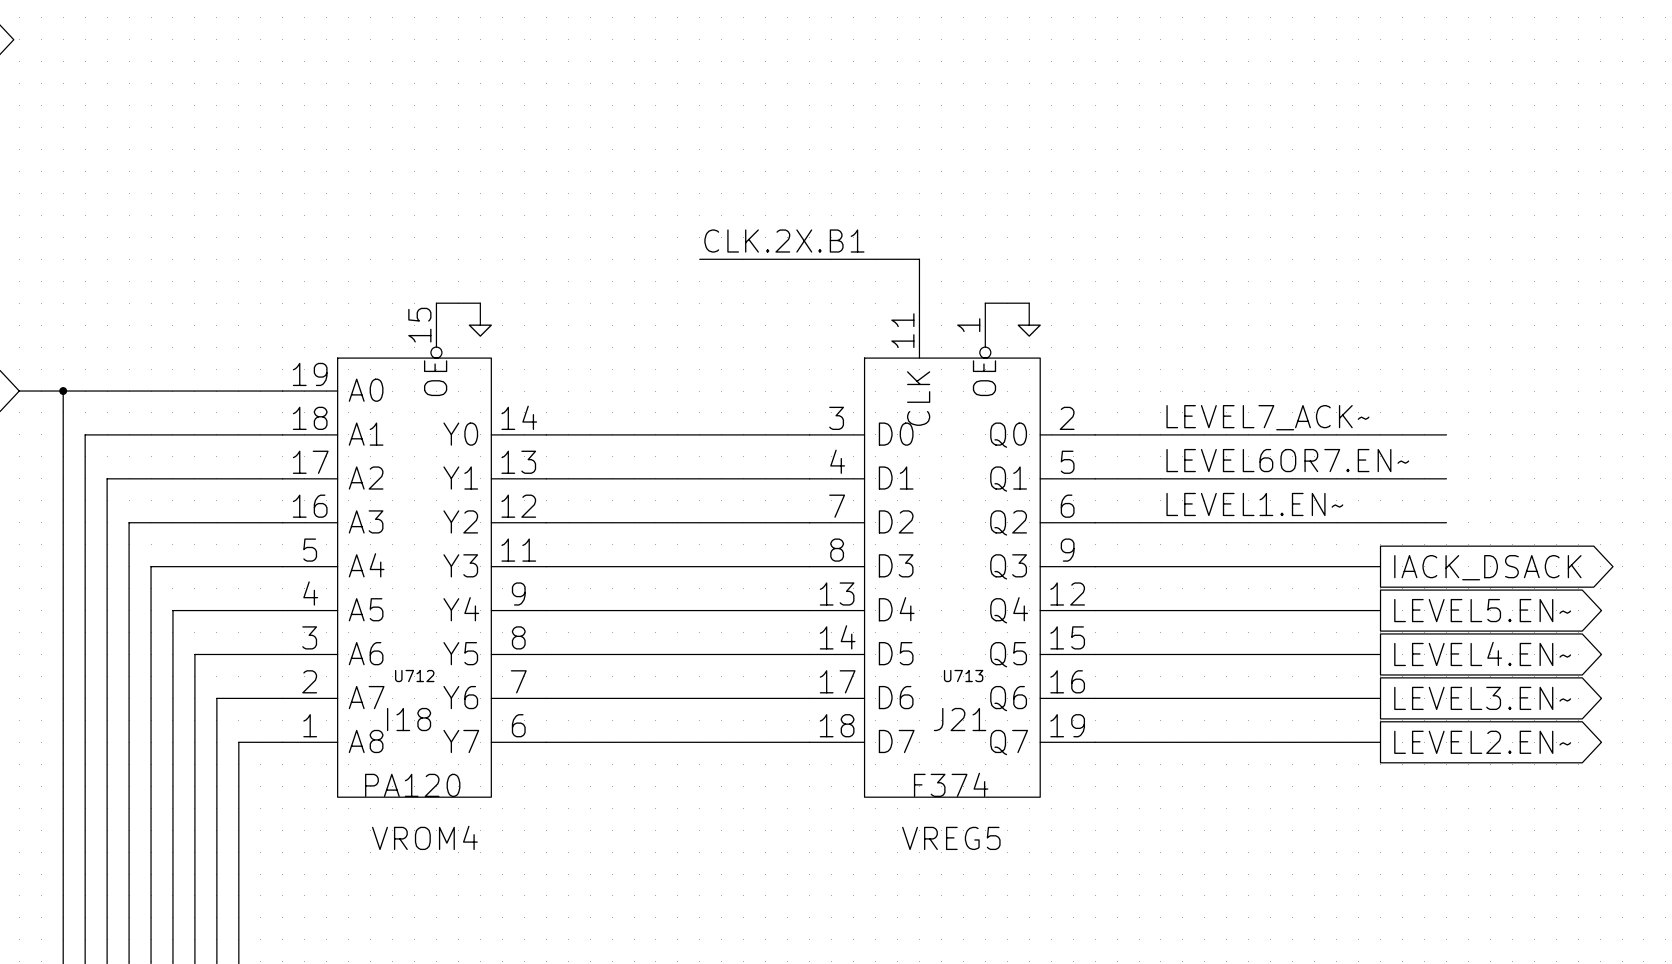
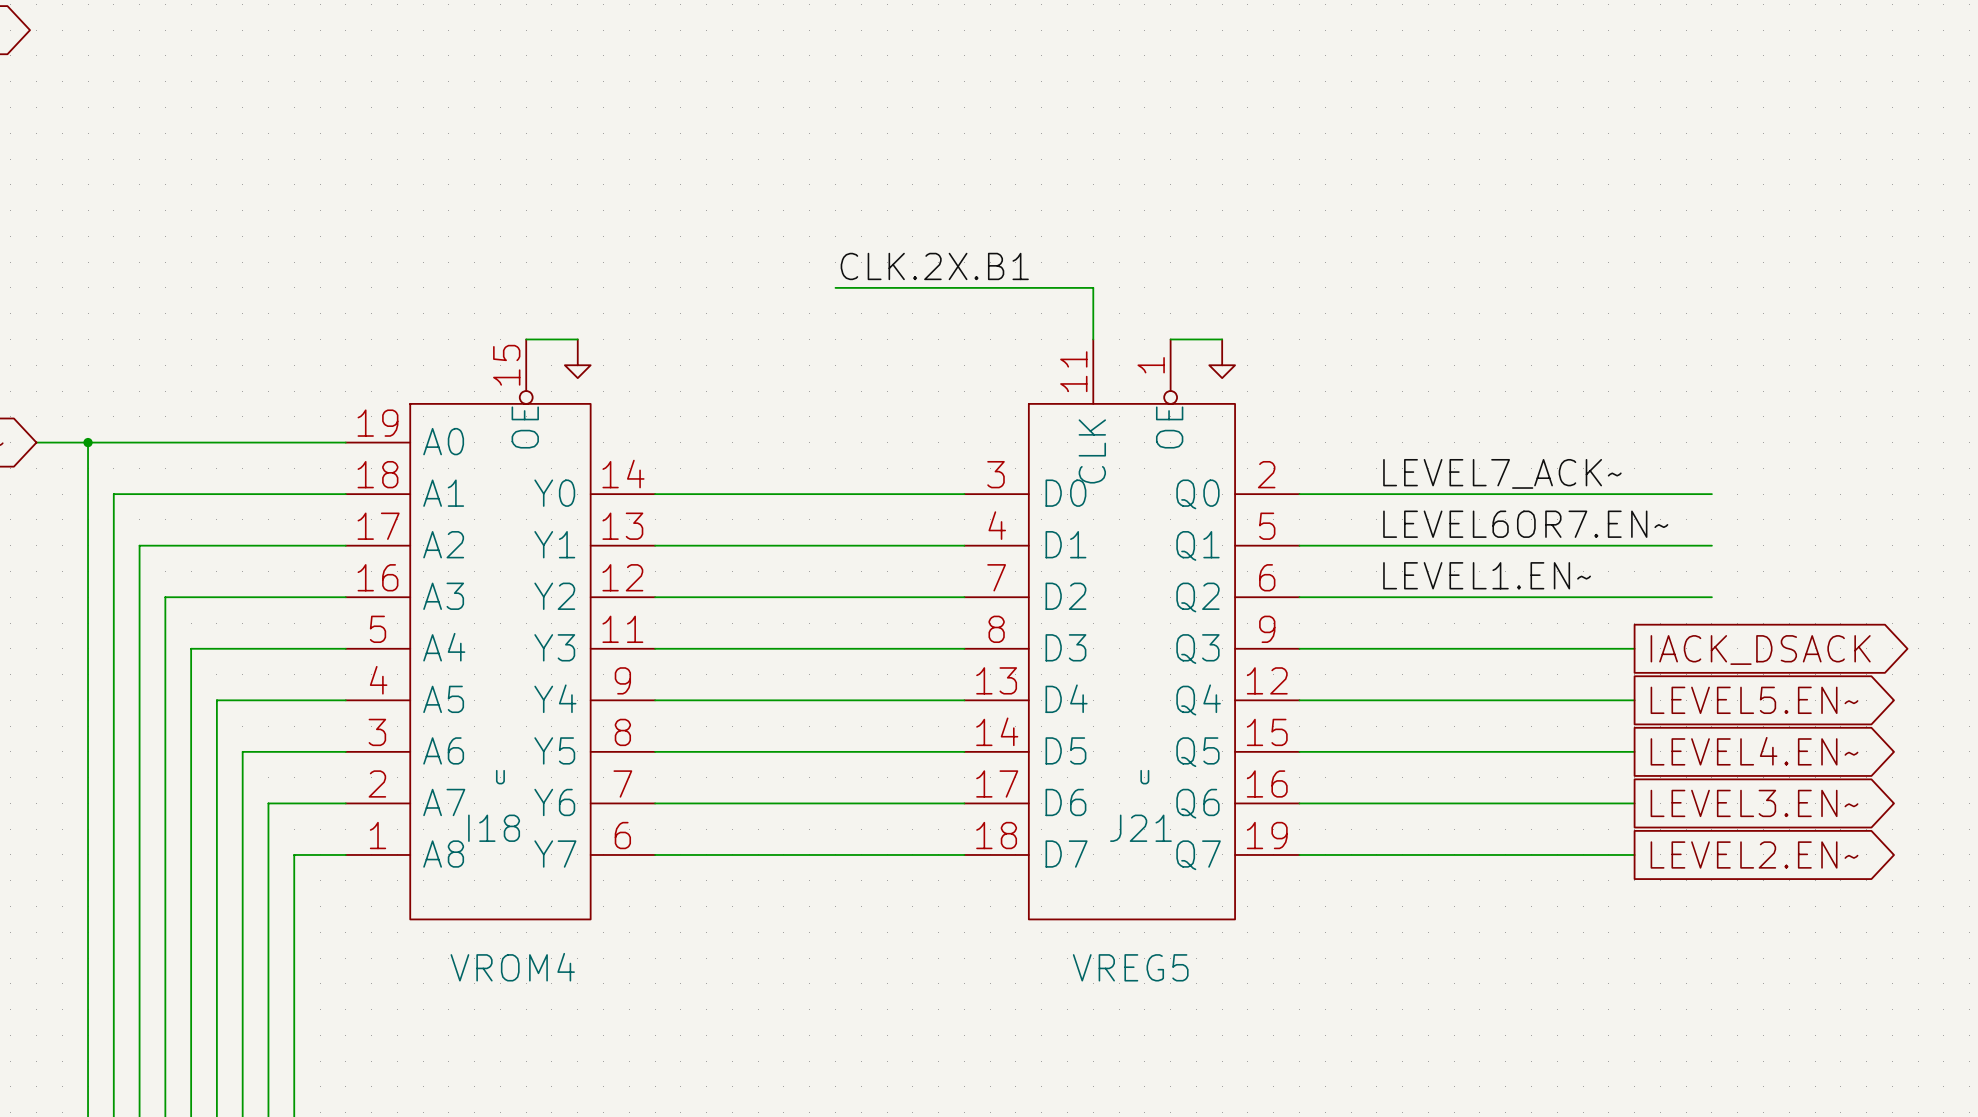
U712 name: U712 (414, 676) -> U (500, 777)
U713 name: U713 (963, 676) -> U (1144, 777)
U713 value: F374 (951, 784) -> none
U712 value: PA120 (412, 785) -> none

